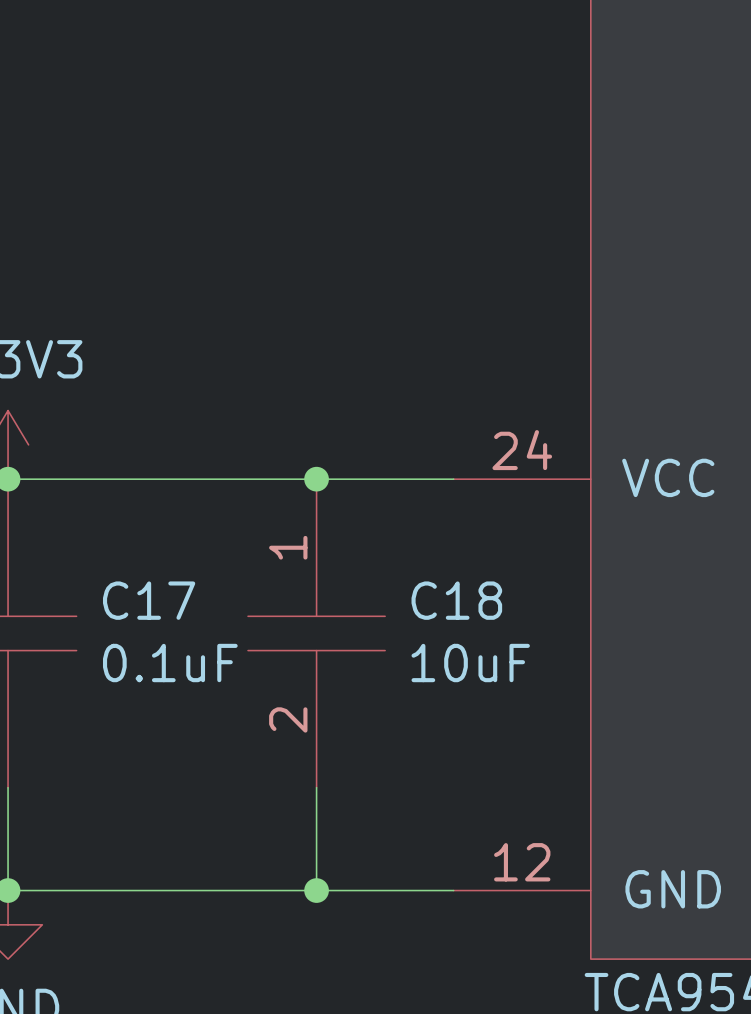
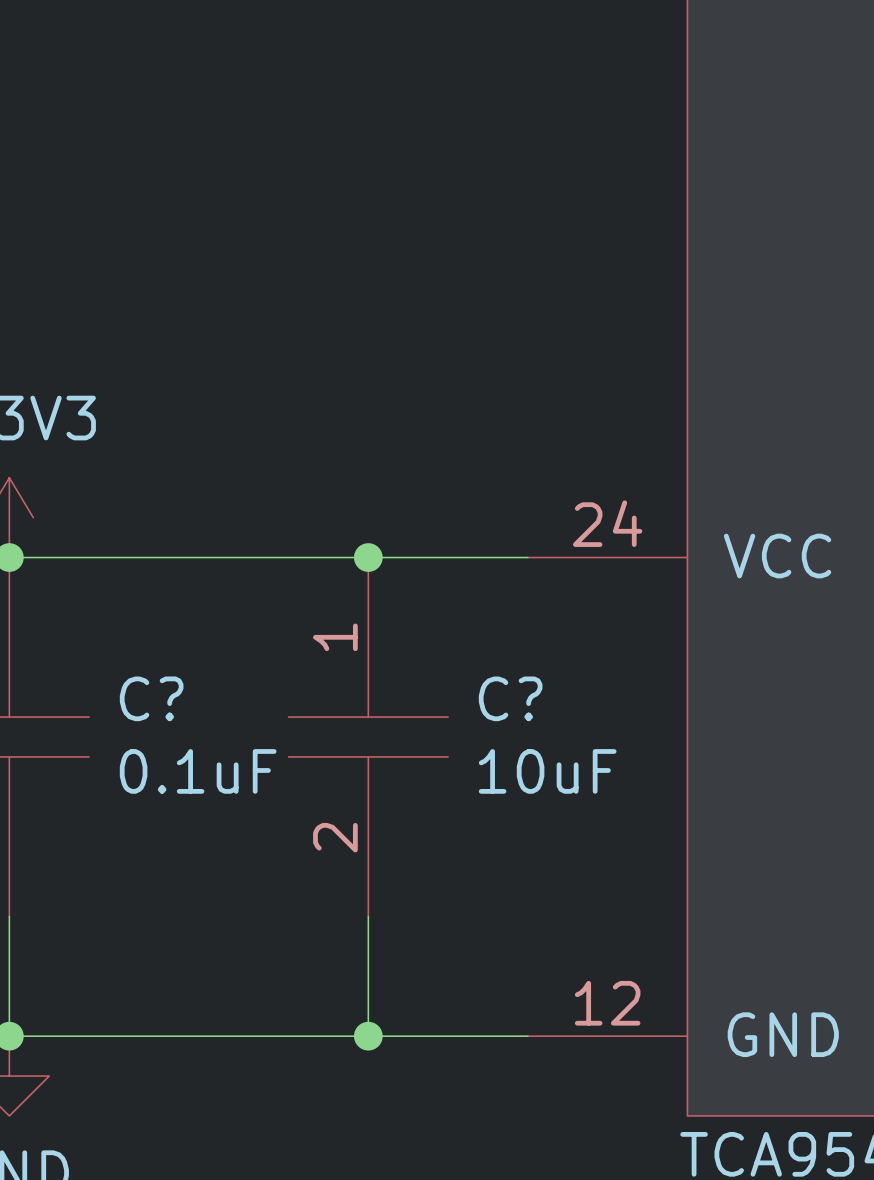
C17 name: C17 (149, 600) -> C? (151, 698)
C18 name: C18 (456, 600) -> C? (510, 698)

